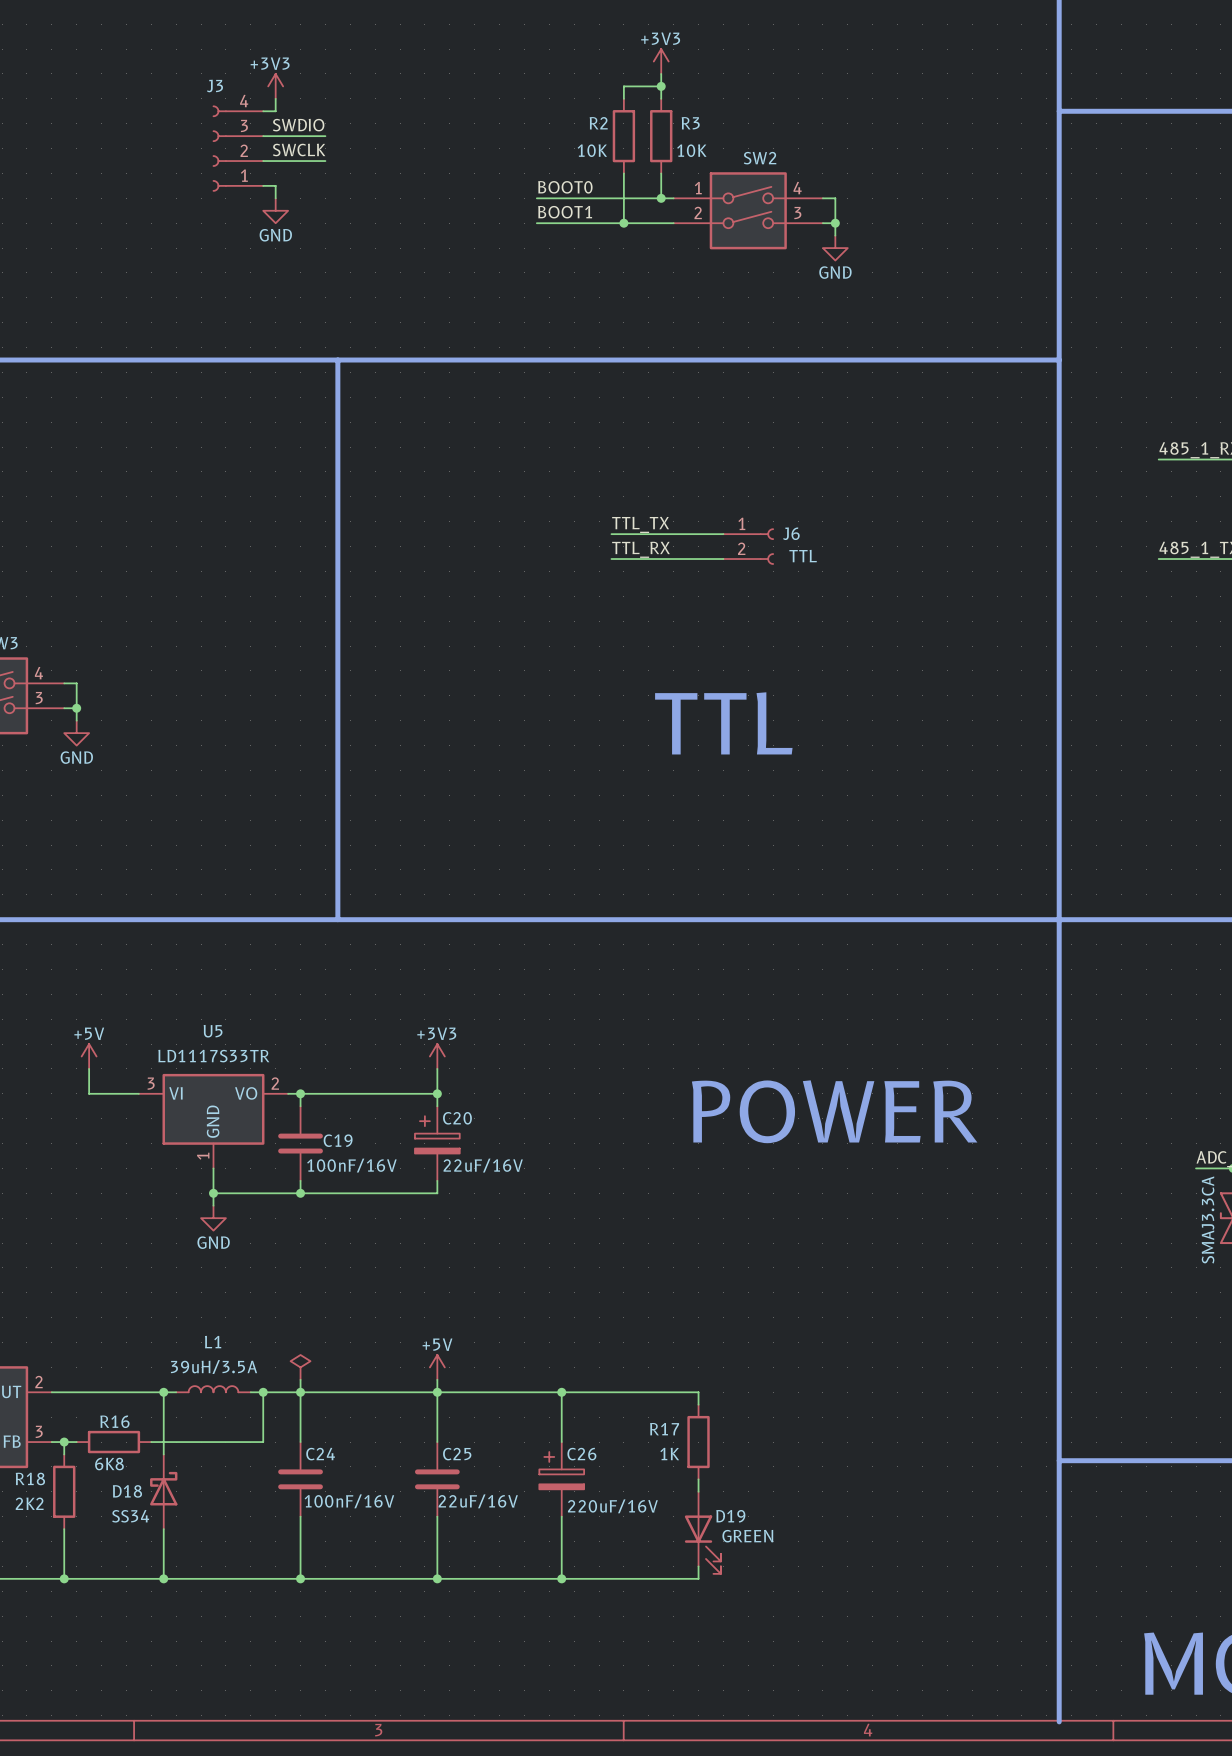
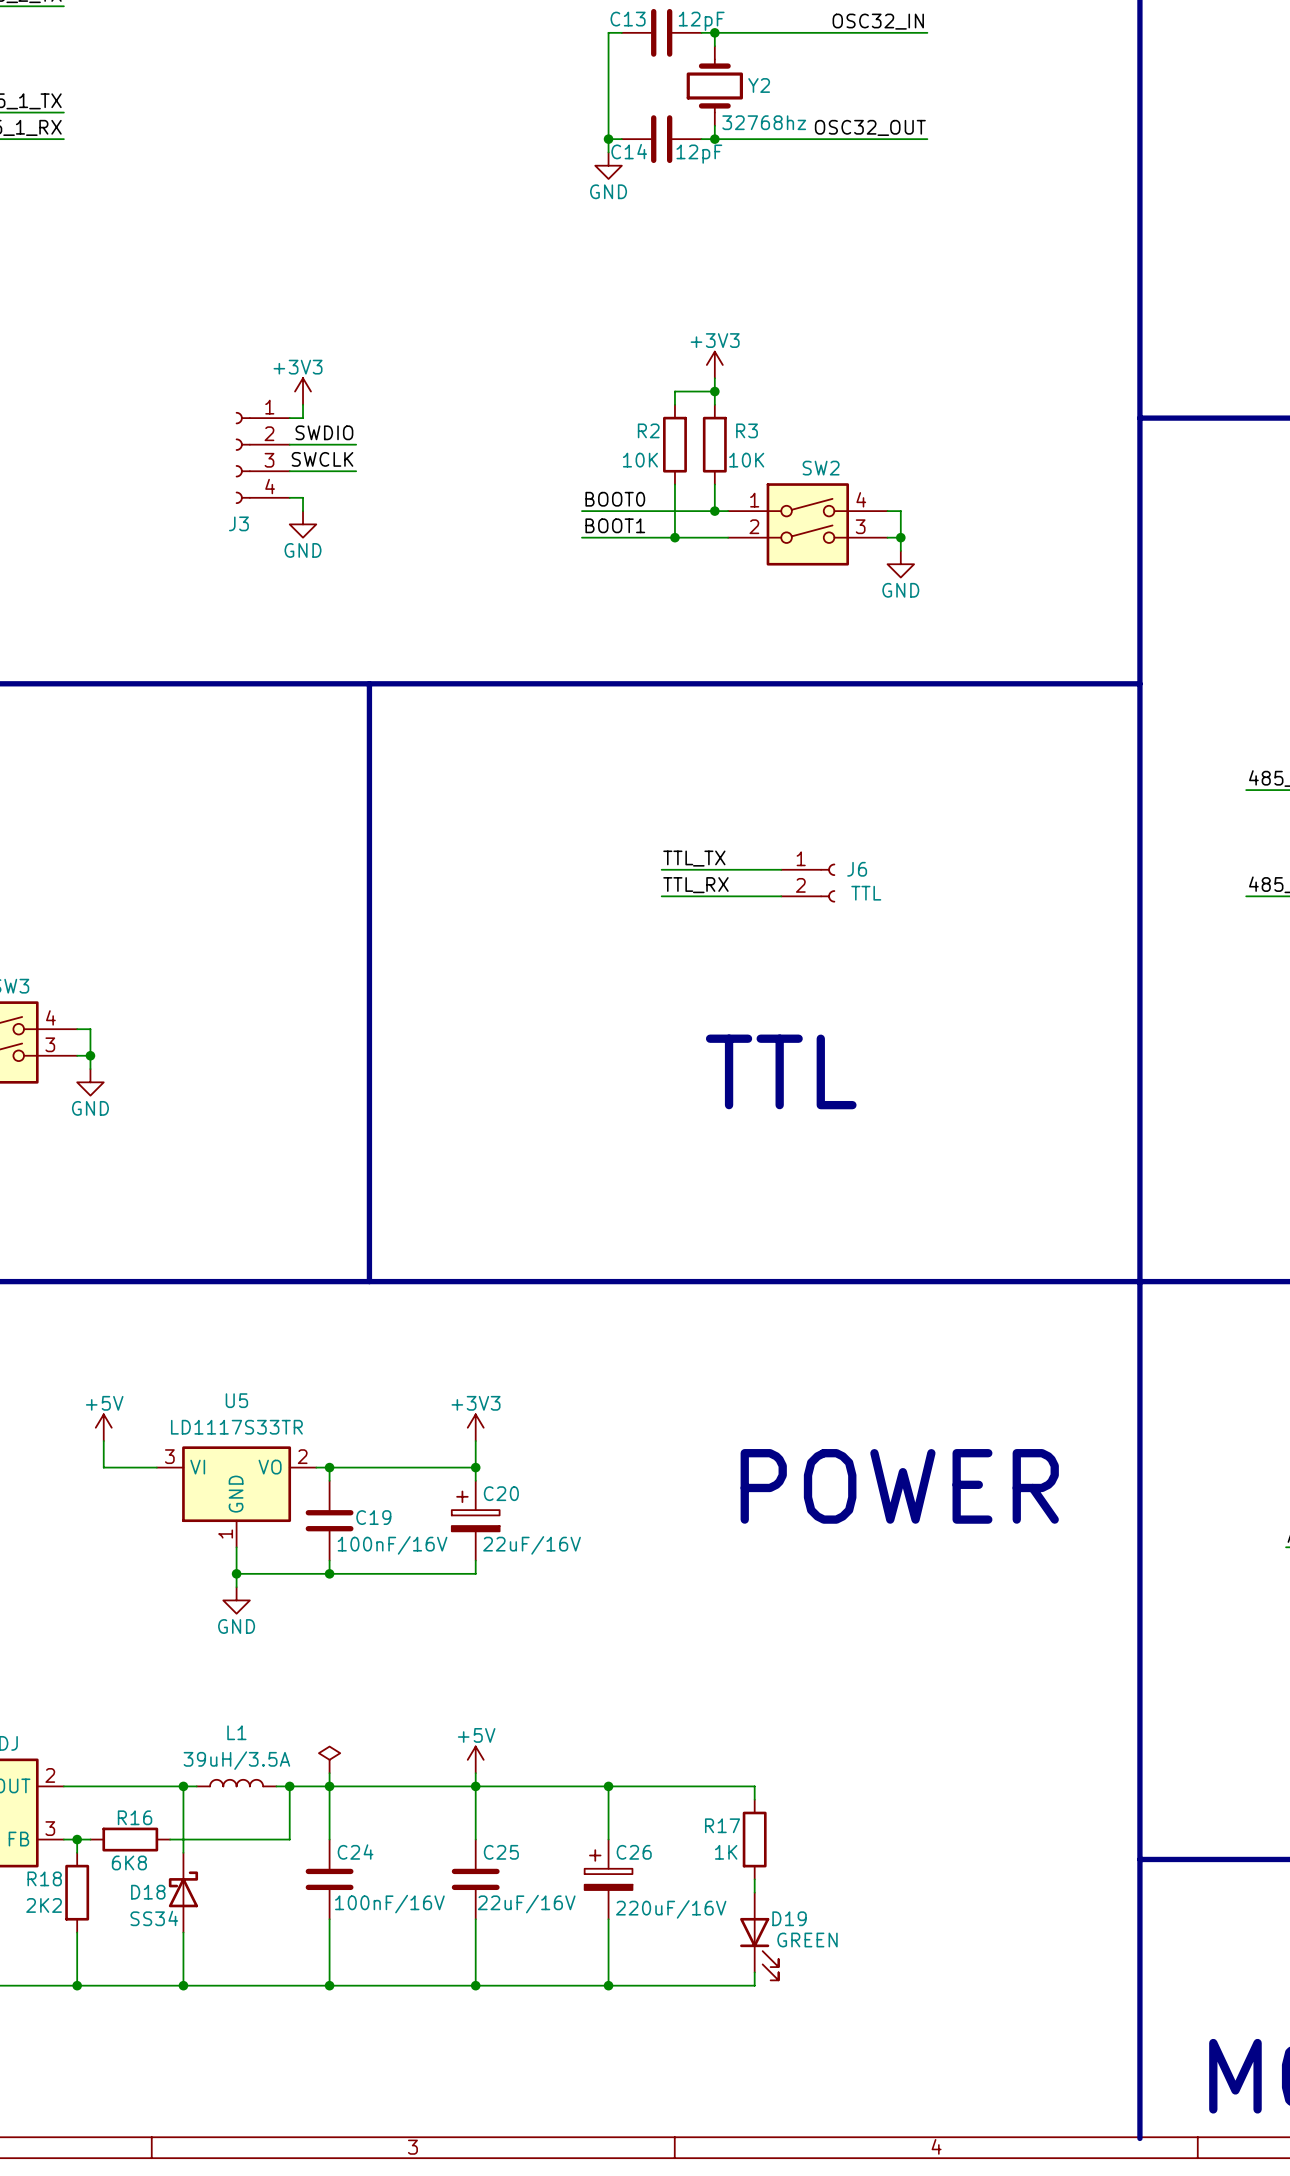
J3 flip: as is (219, 148) -> up-down (243, 457)

